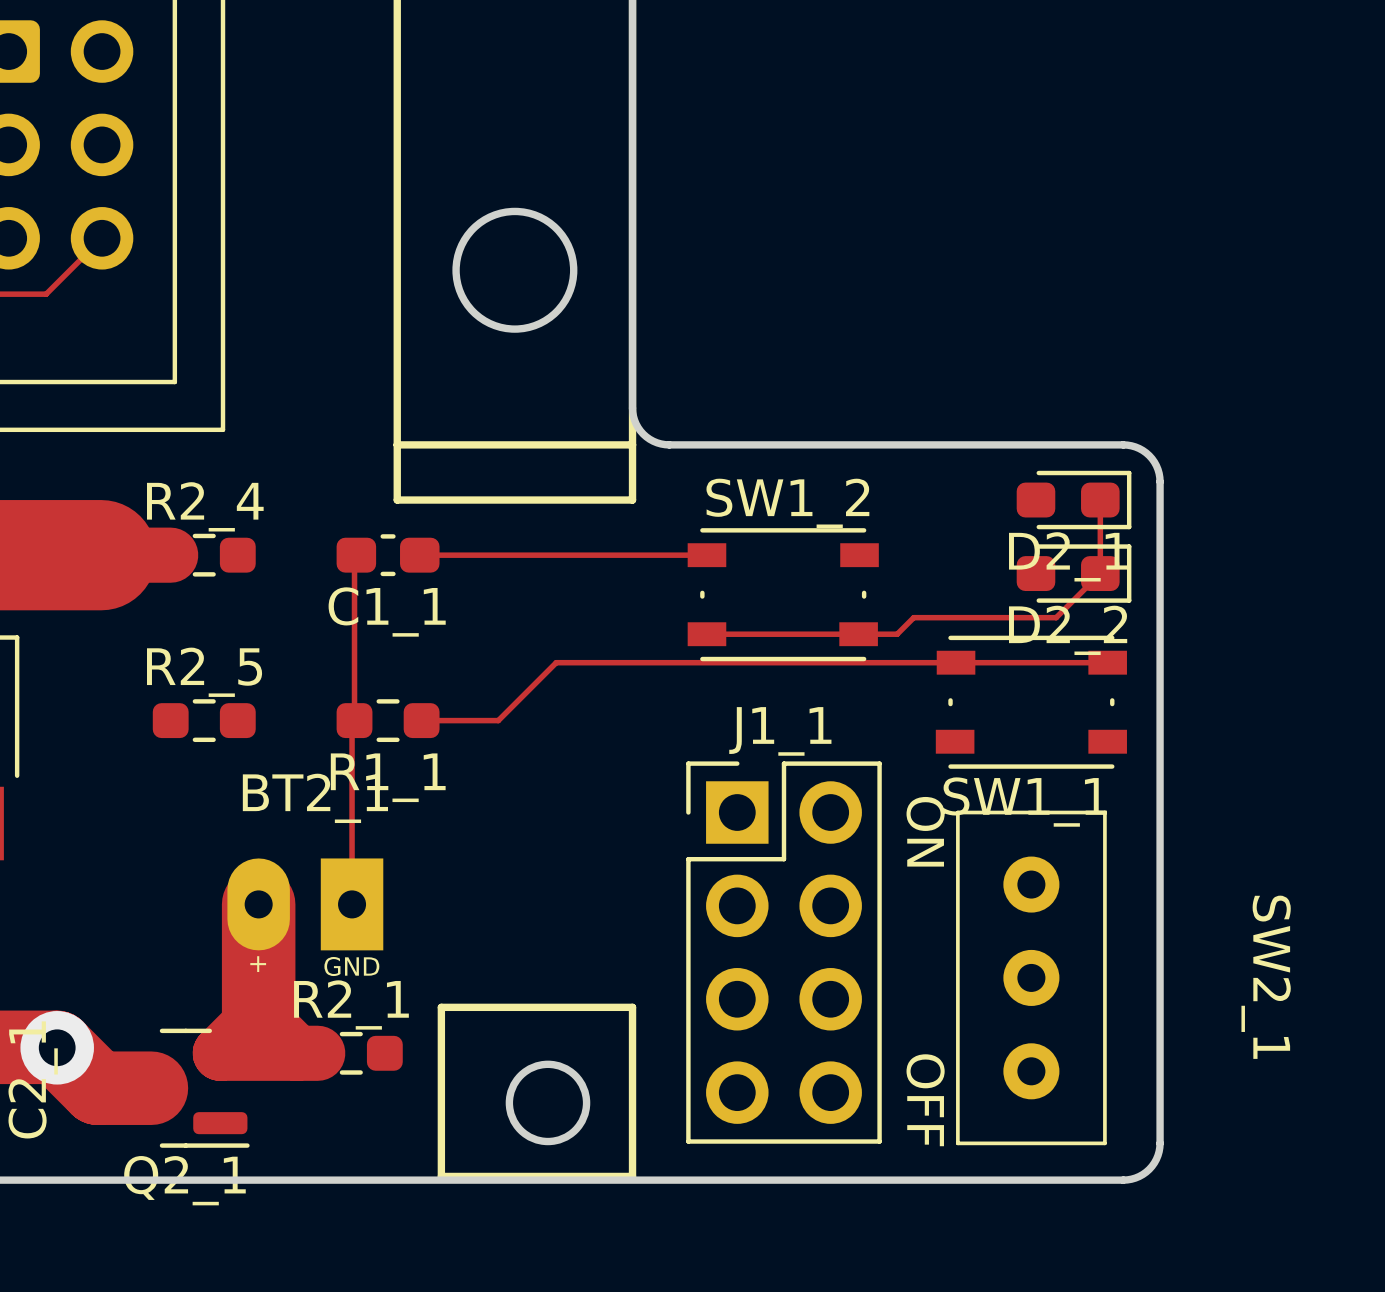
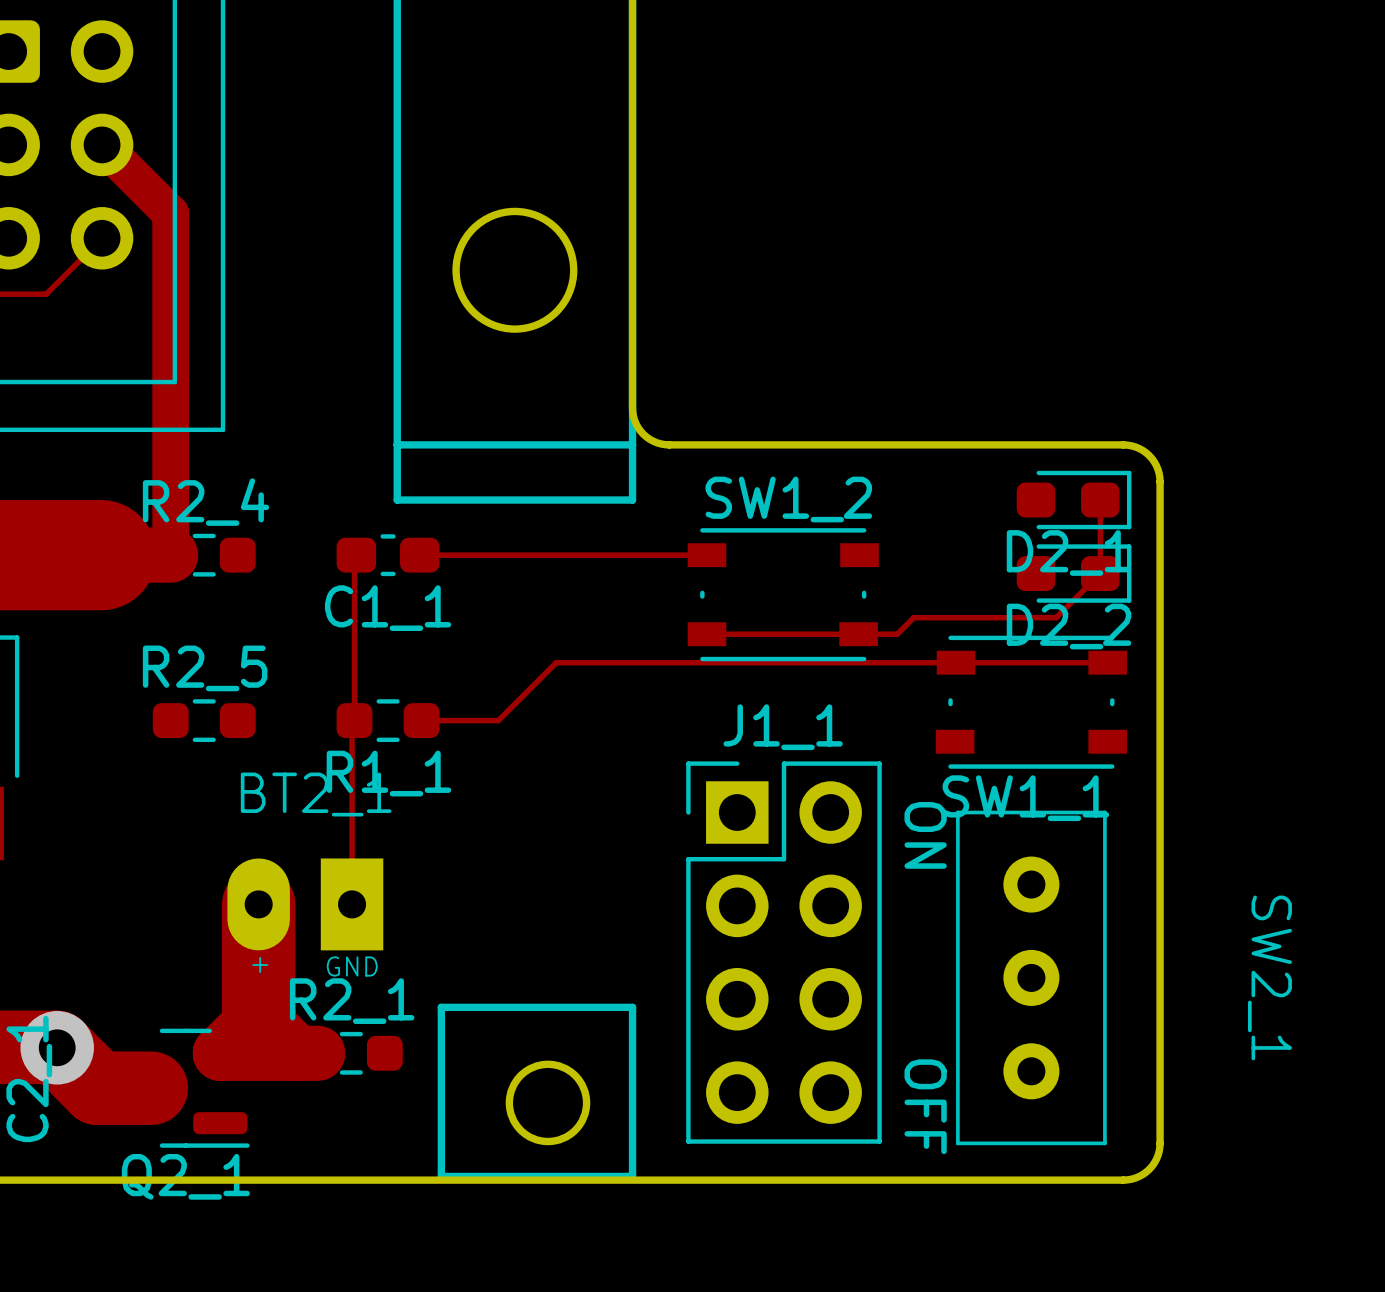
track: none -> (102, 144) (170, 213) (170, 555)

